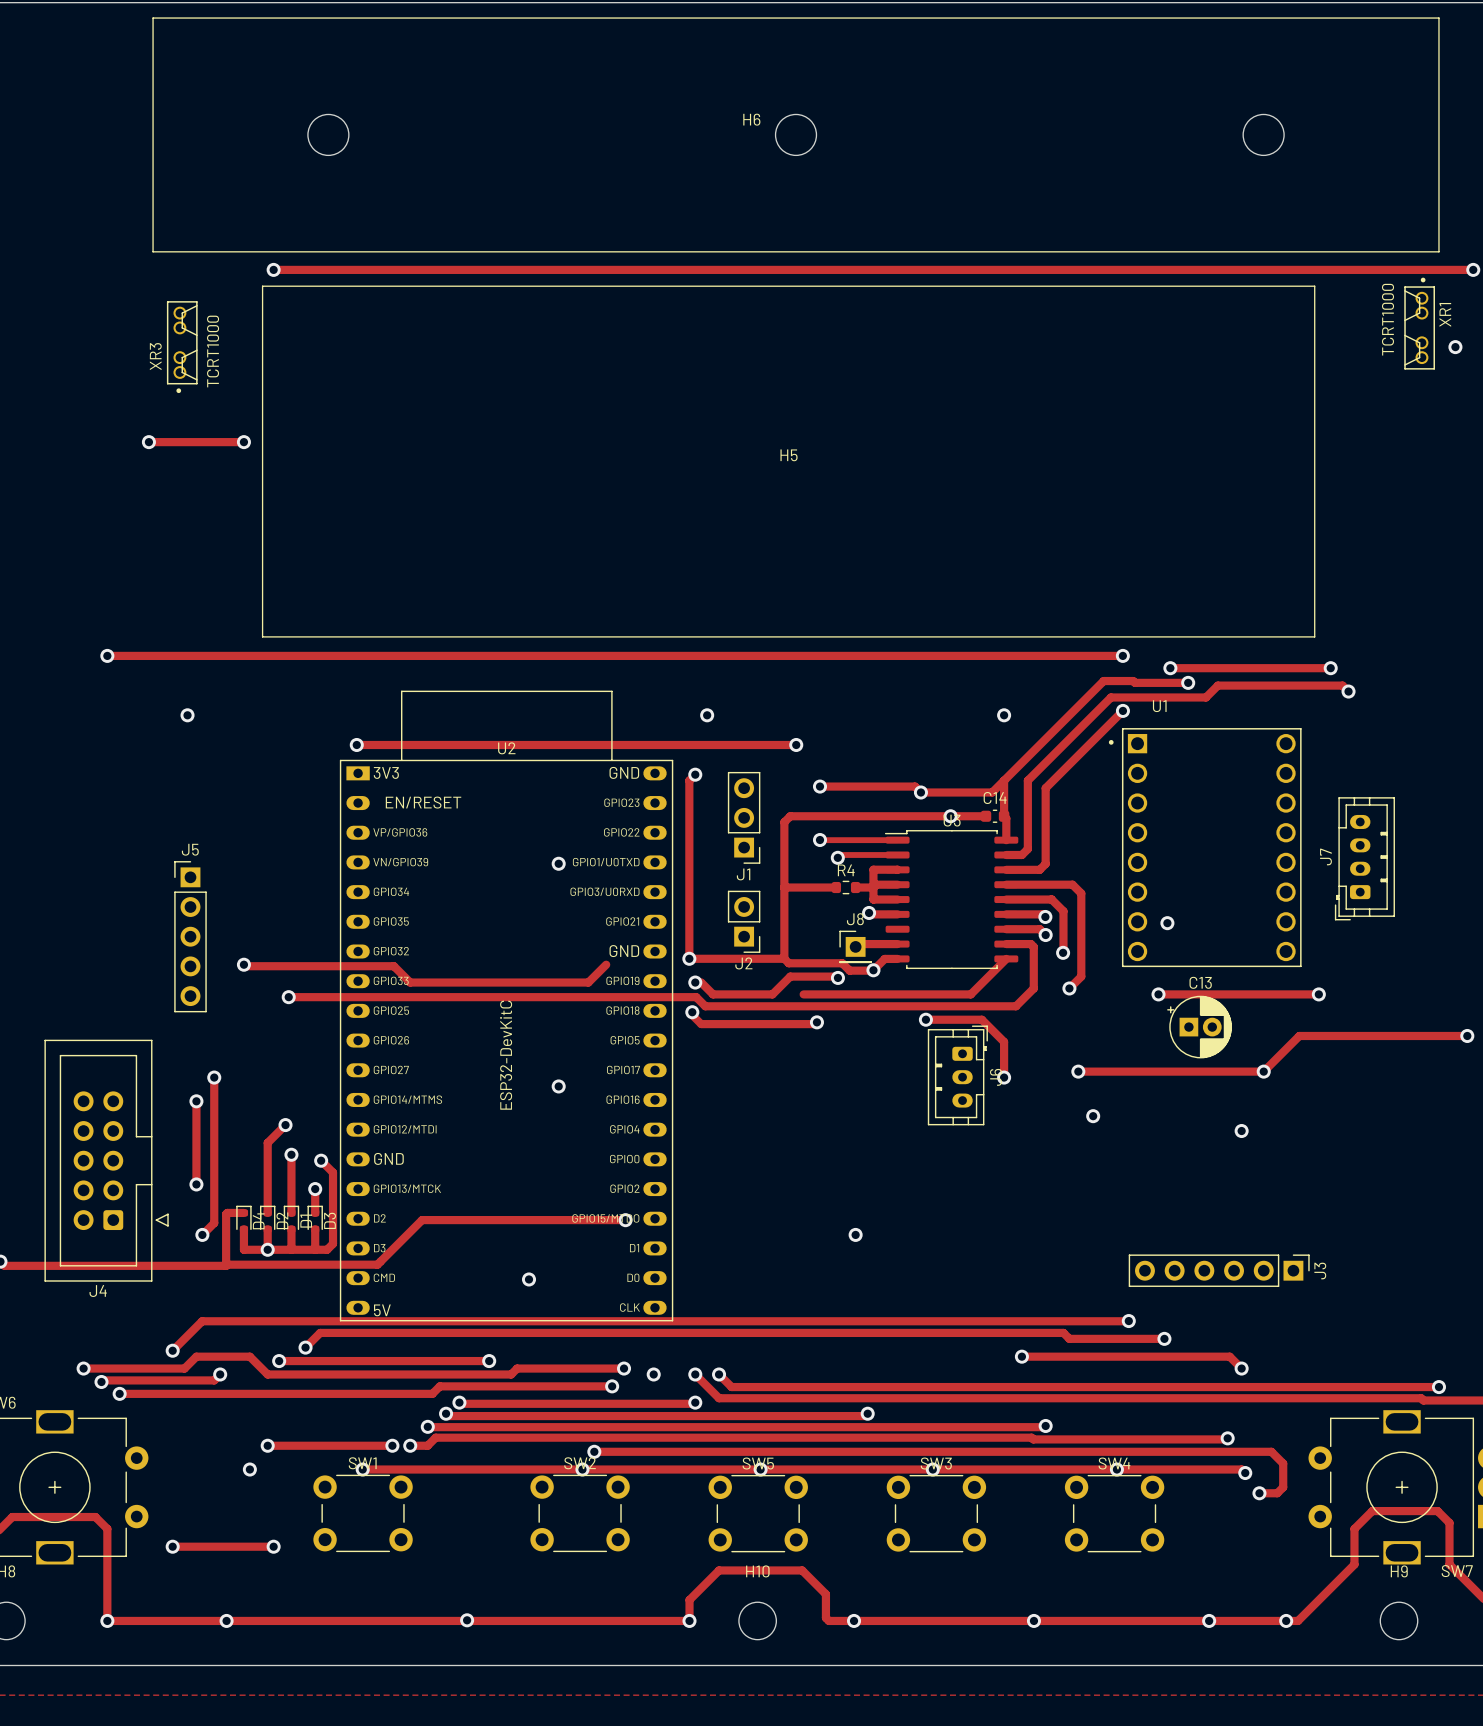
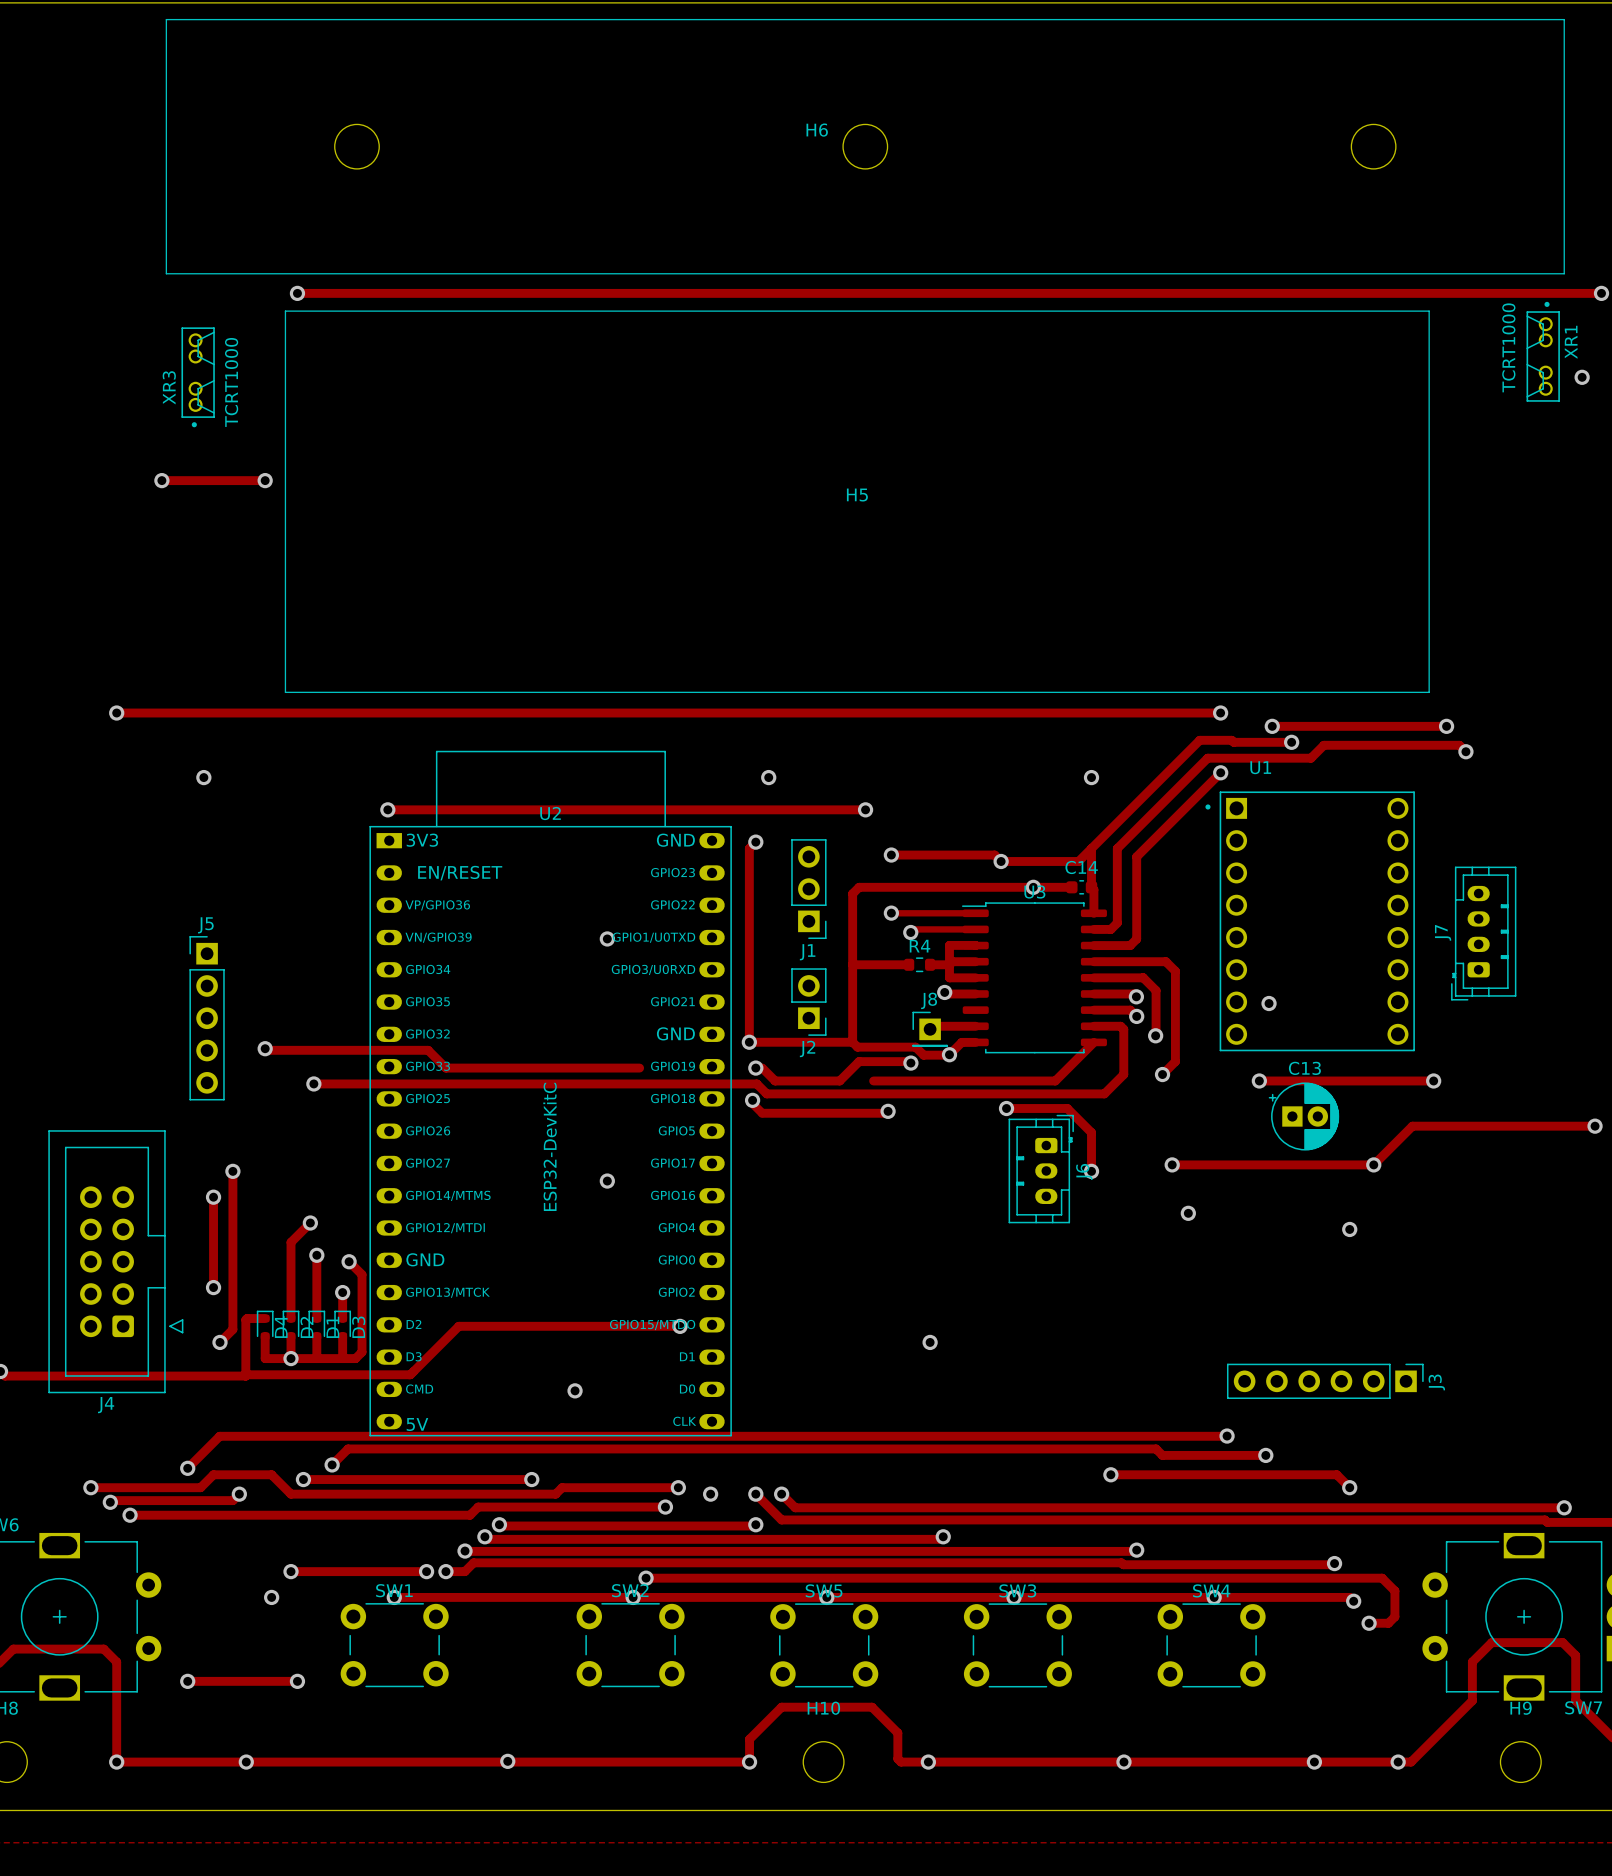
track: (606, 964) (588, 982) -> none

